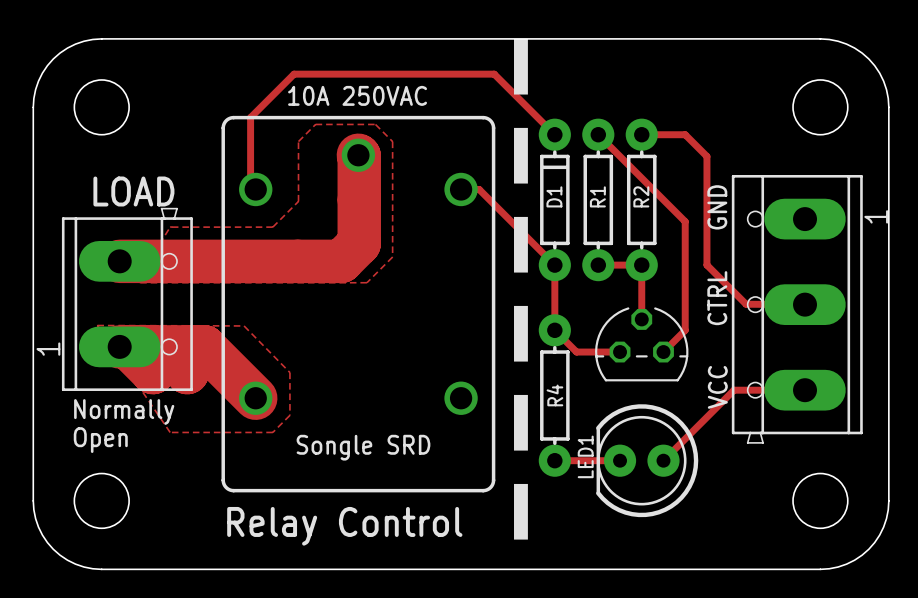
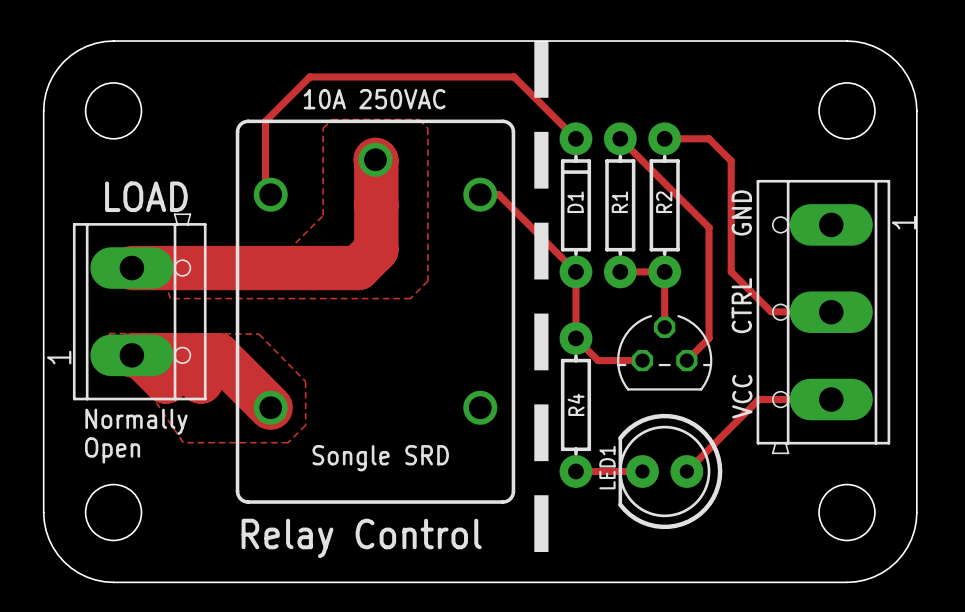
zone outline: (170, 227) (148, 261) (238, 269) (230, 278) (135, 278) (140, 282) (366, 282) (392, 257) (392, 141) (375, 124) (315, 124) (298, 141) (298, 201) (272, 227) (171, 227) -> none
zone outline: none -> (183, 250) (161, 268) (170, 298) (410, 298) (427, 281) (427, 128) (419, 119) (331, 119) (323, 128) (323, 215) (288, 250) (185, 250)

